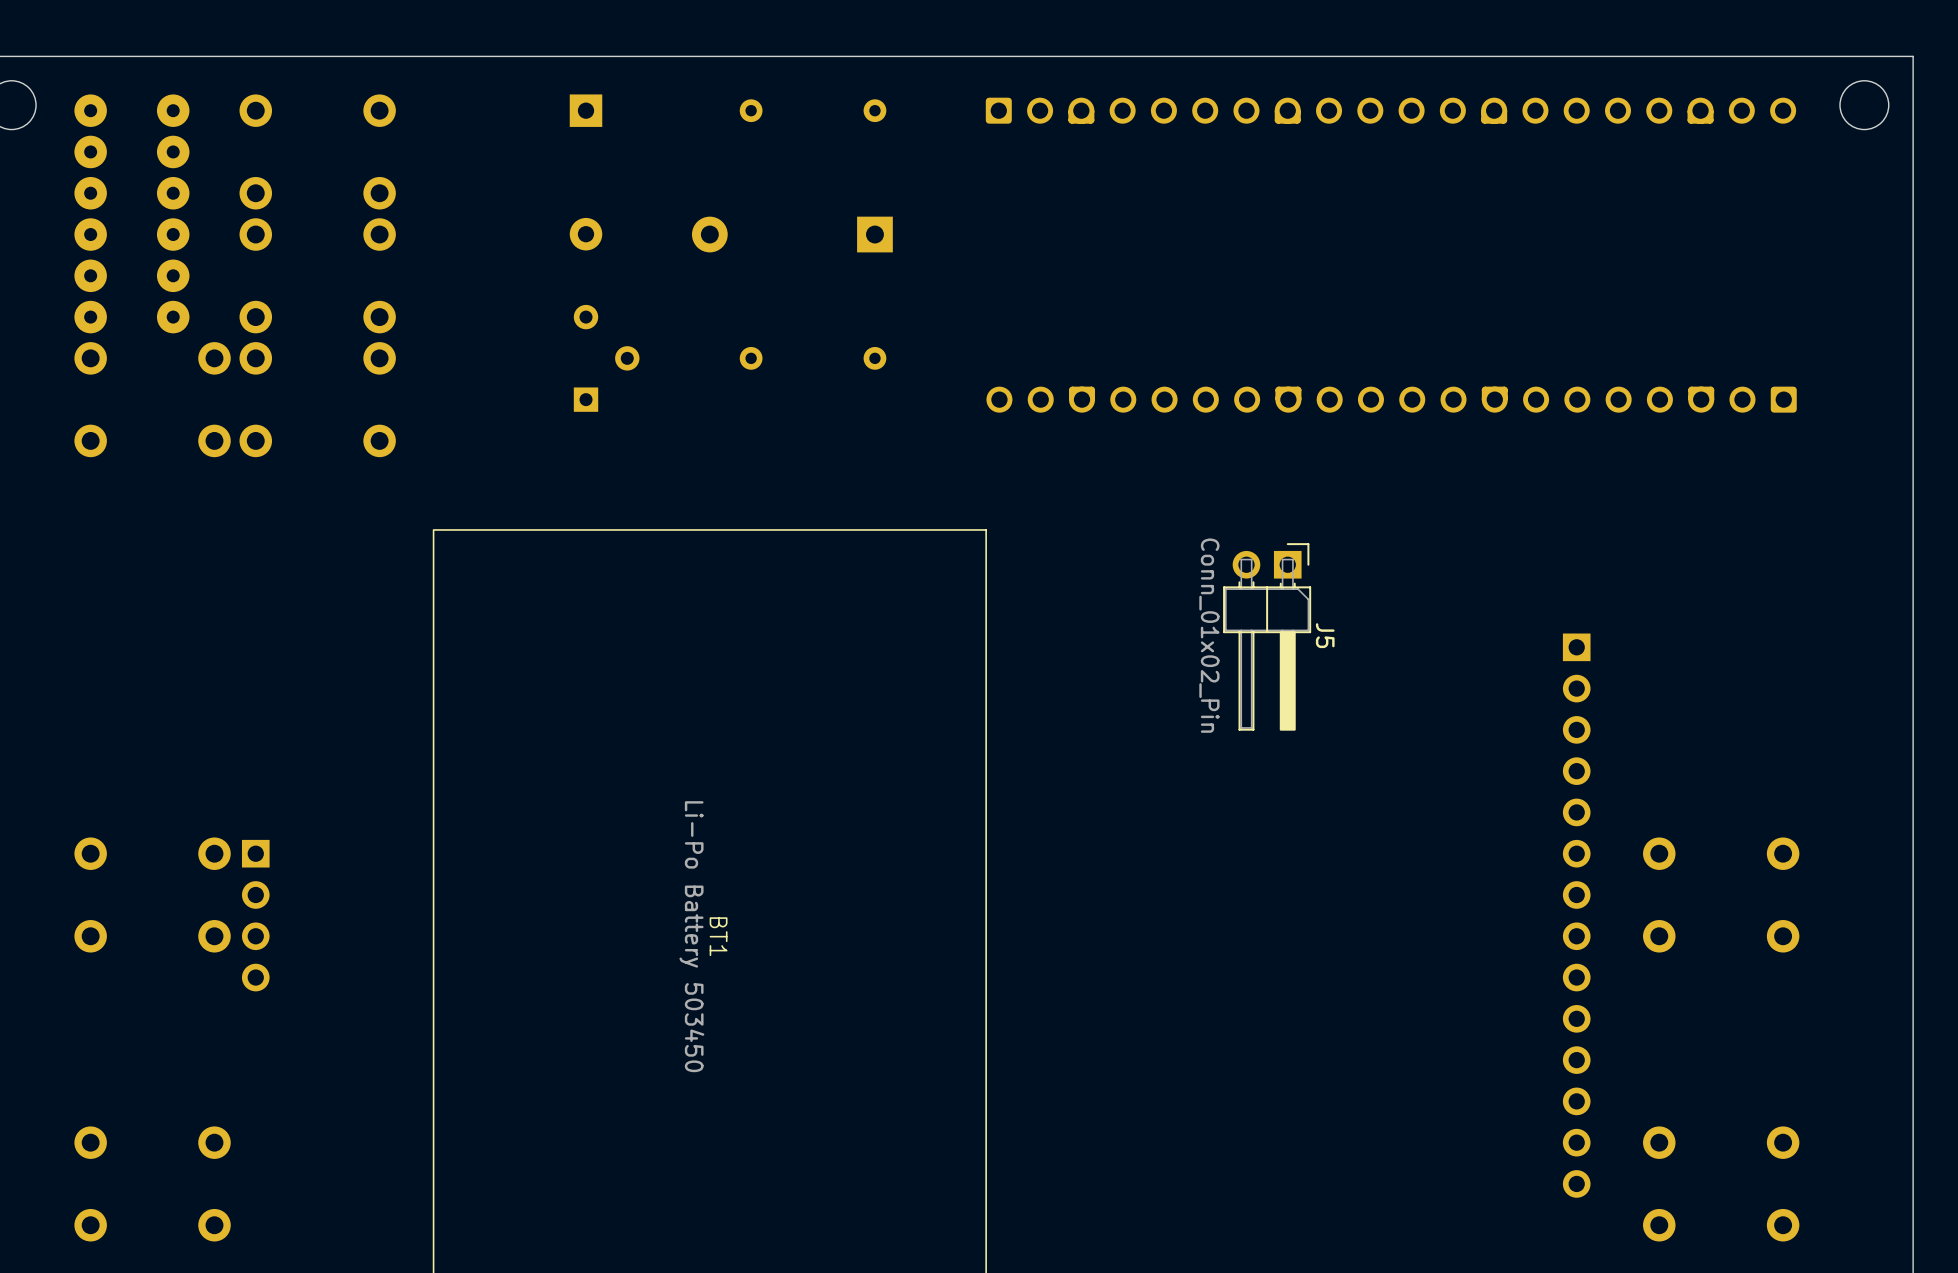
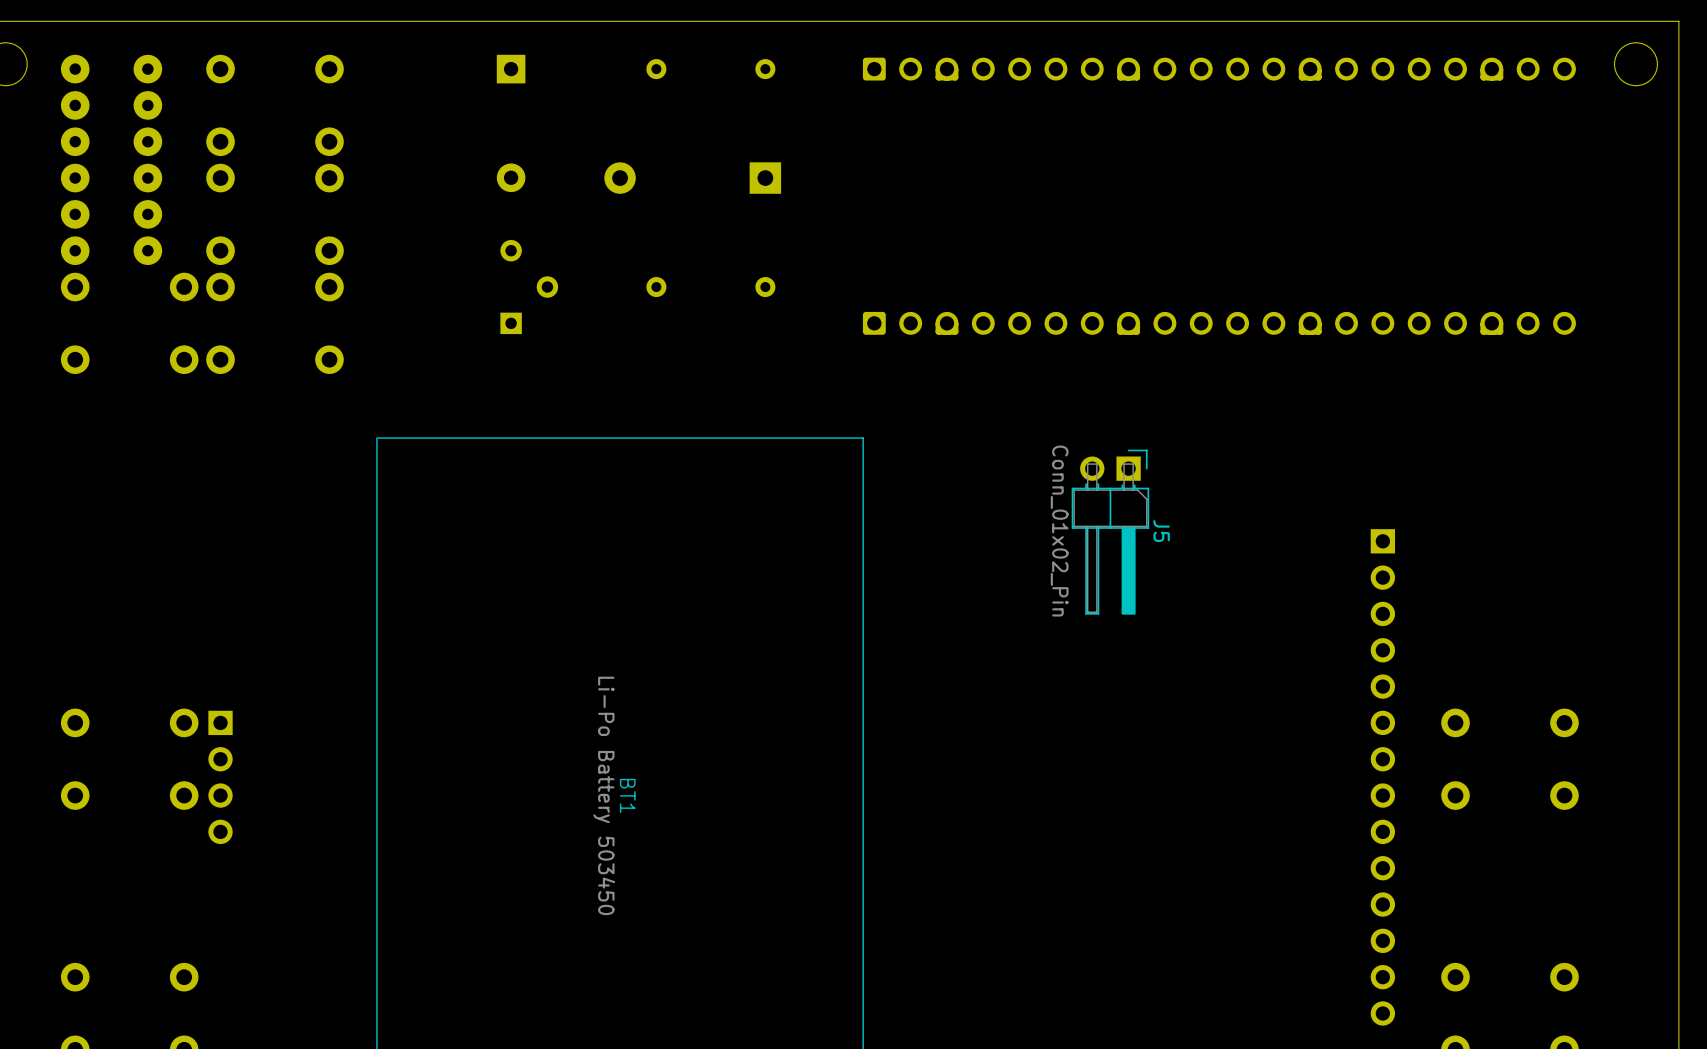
part rotation: 0° (1391, 399) -> 180° (1219, 323)

